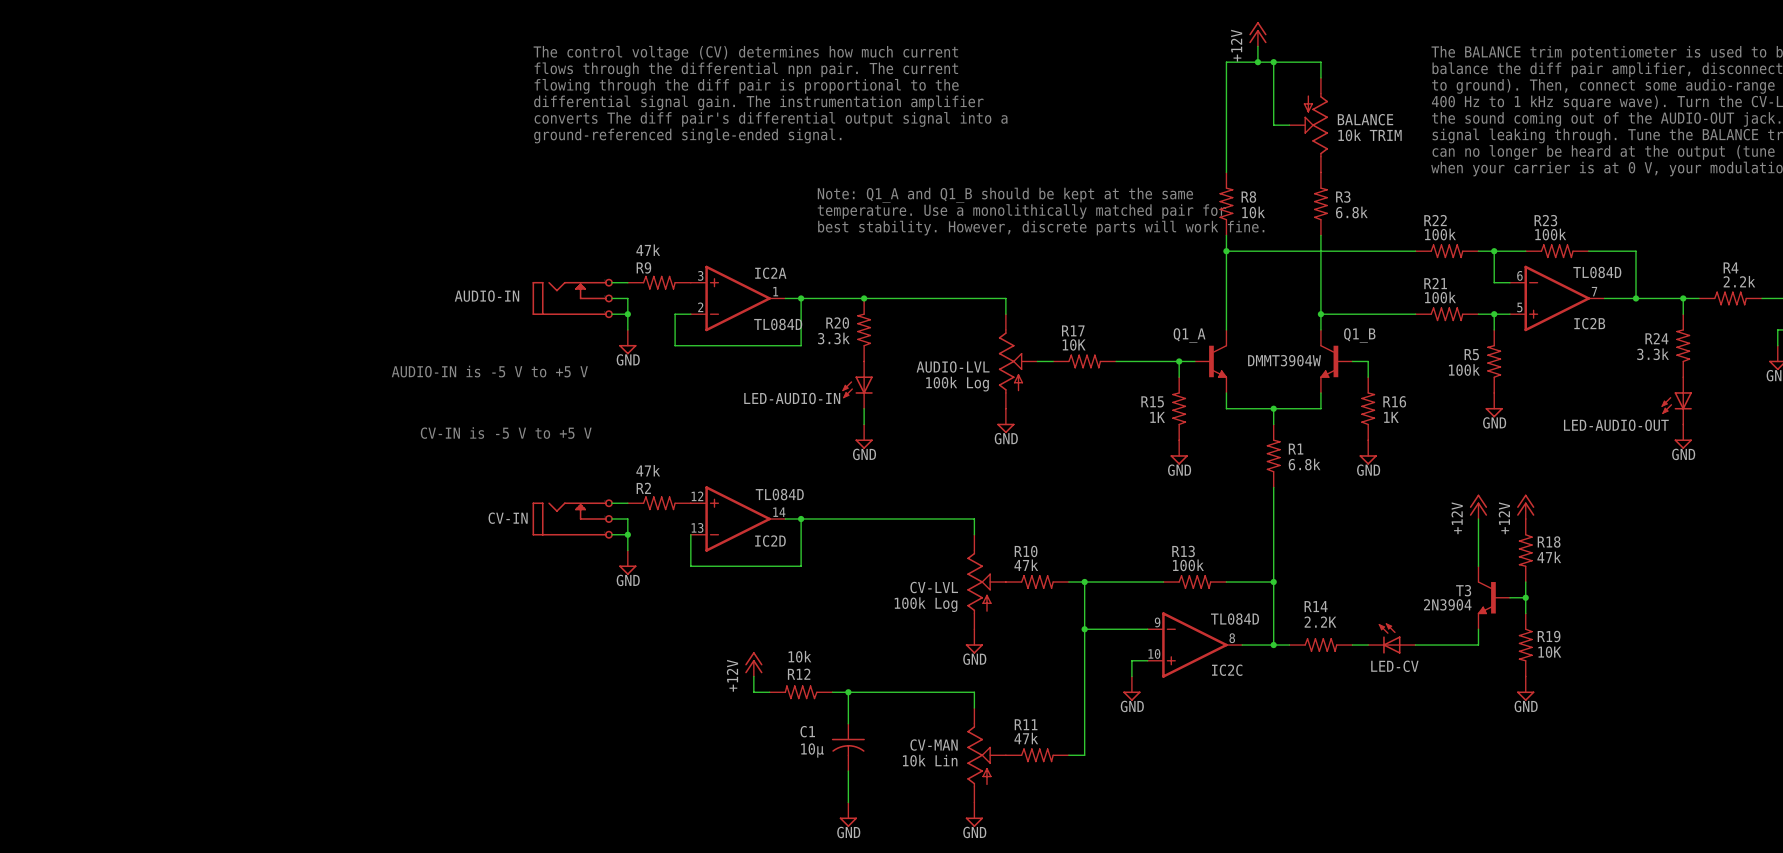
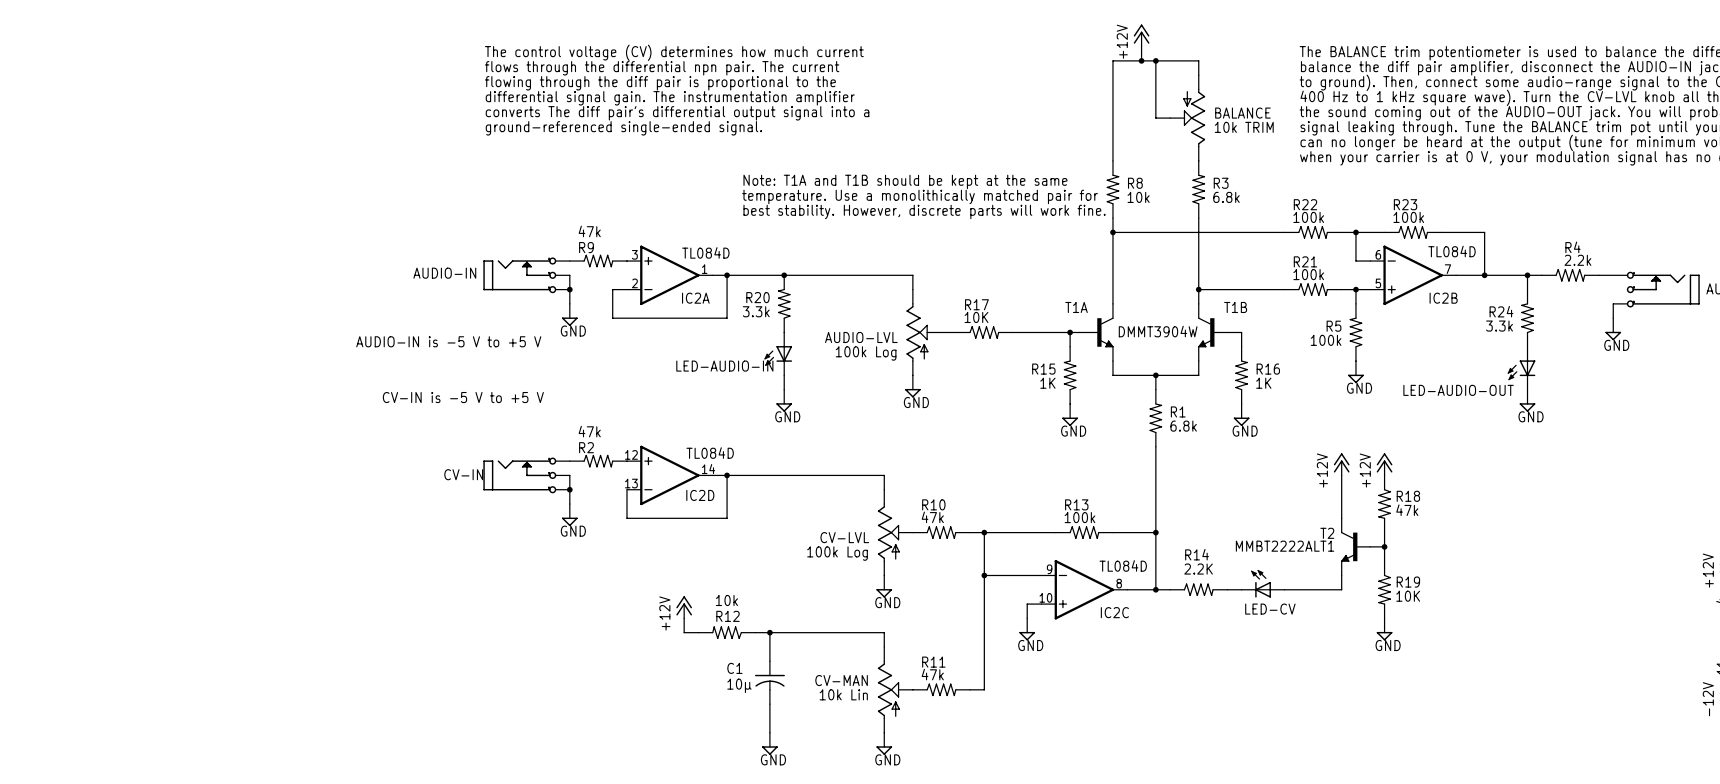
text: Note: Q1_A and Q1_B should be kept at the same (1005, 195) -> Note: T1A and T1B should be kept at the same (905, 181)
IC2A name position: IC2A (770, 273) -> IC2A (695, 298)
IC2A value position: TL084D (778, 324) -> TL084D (705, 252)
Q1_A name: Q1_A (1189, 335) -> T1A (1076, 307)
Q1_B name: Q1_B (1359, 335) -> T1B (1235, 307)
T3 name: T3 (1463, 590) -> T2 (1327, 533)
T3 value: 2N3904 (1447, 604) -> MMBT2222ALT1 (1285, 546)

